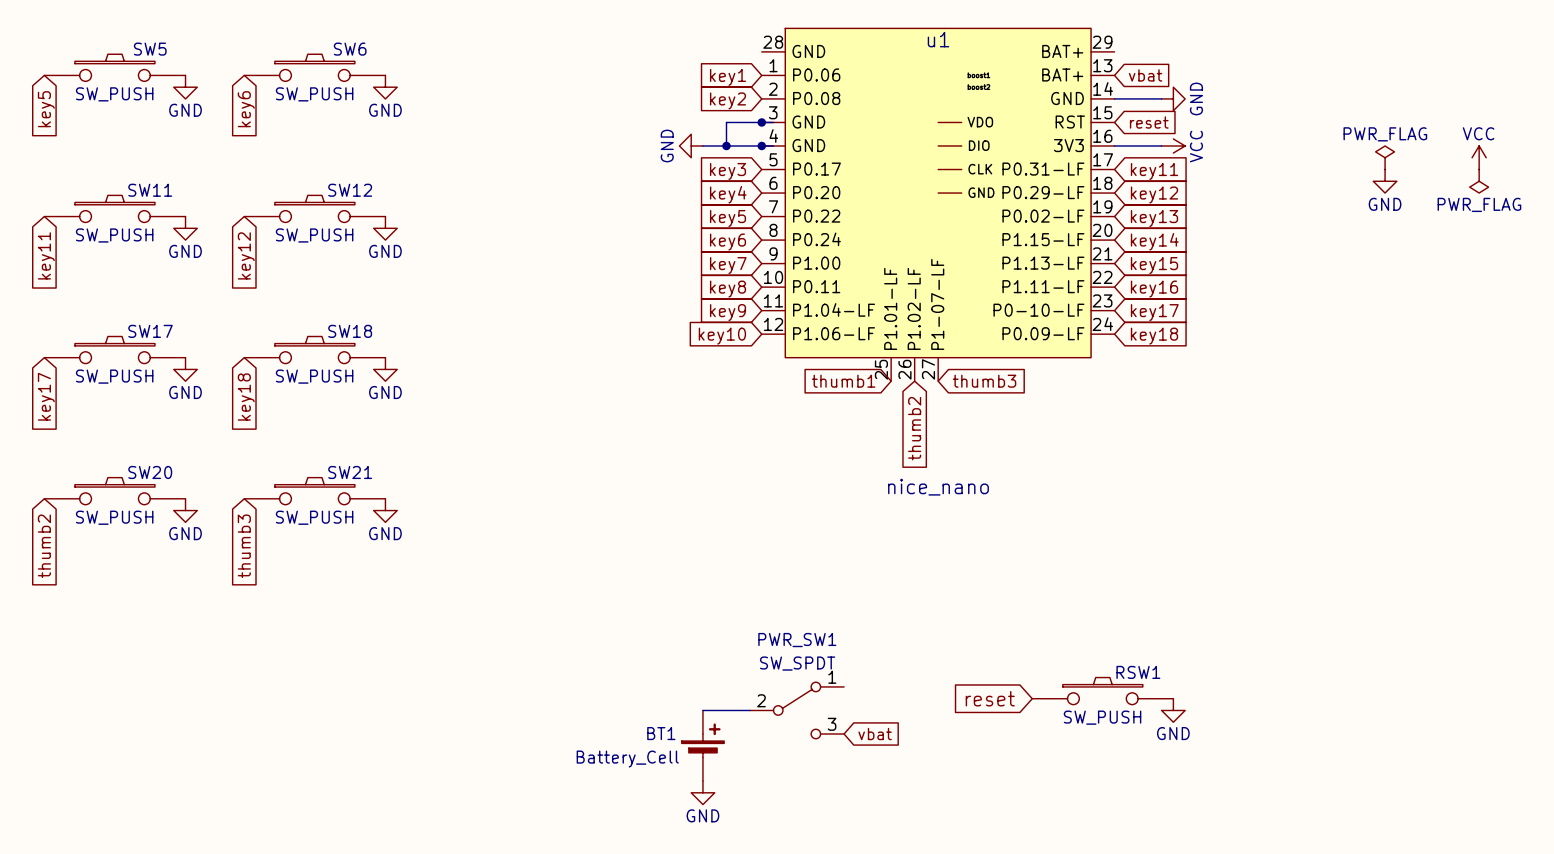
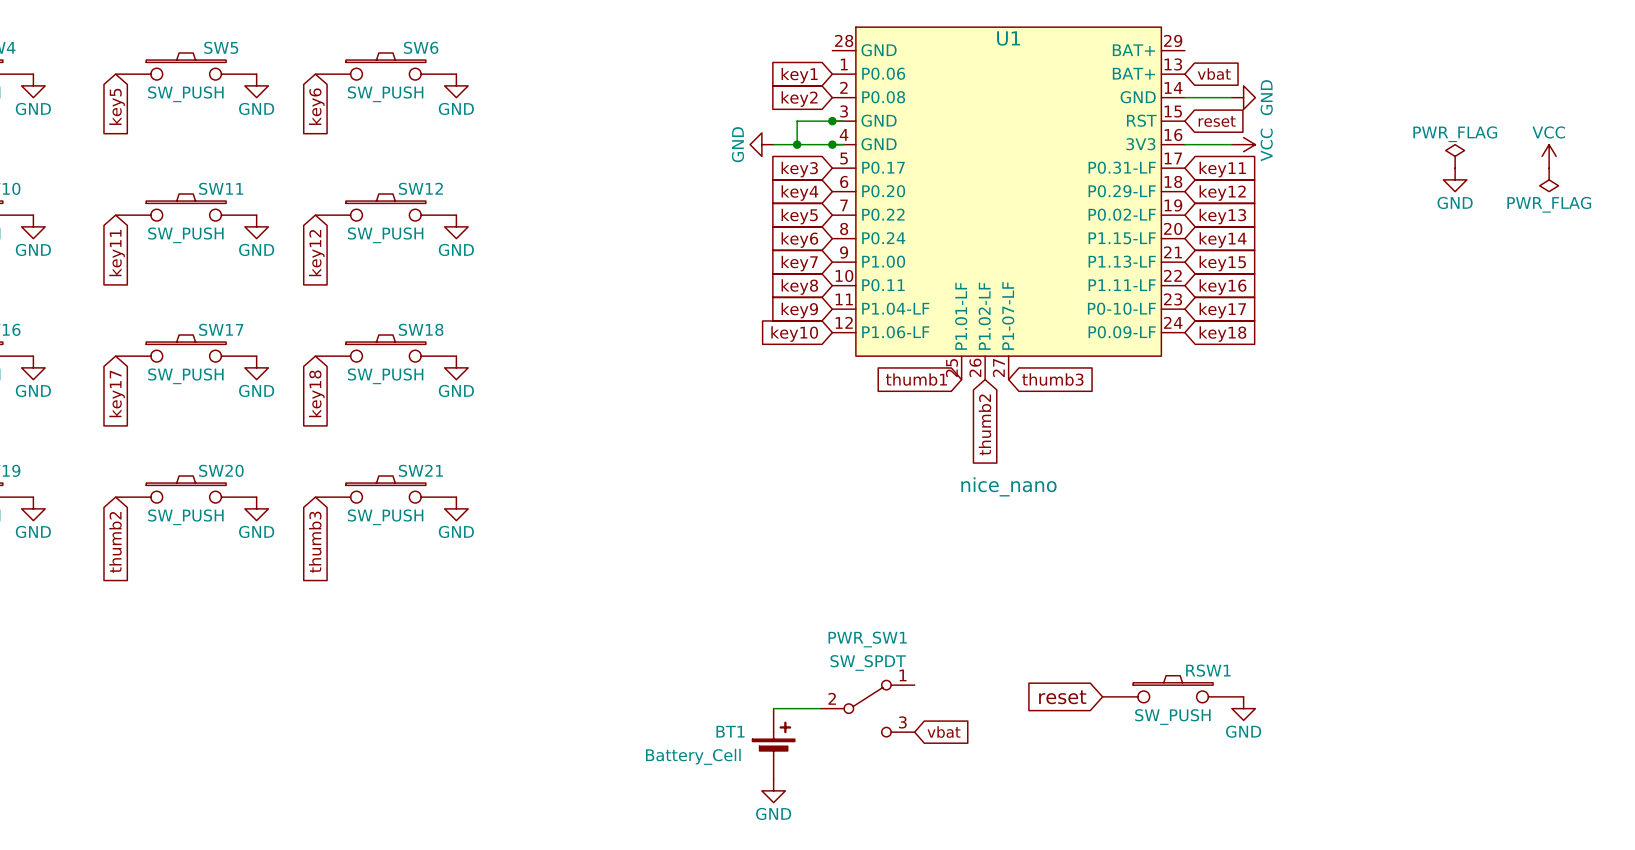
u1: nice_nano (938, 204) -> none
U1: none -> nice_nano (1008, 203)

